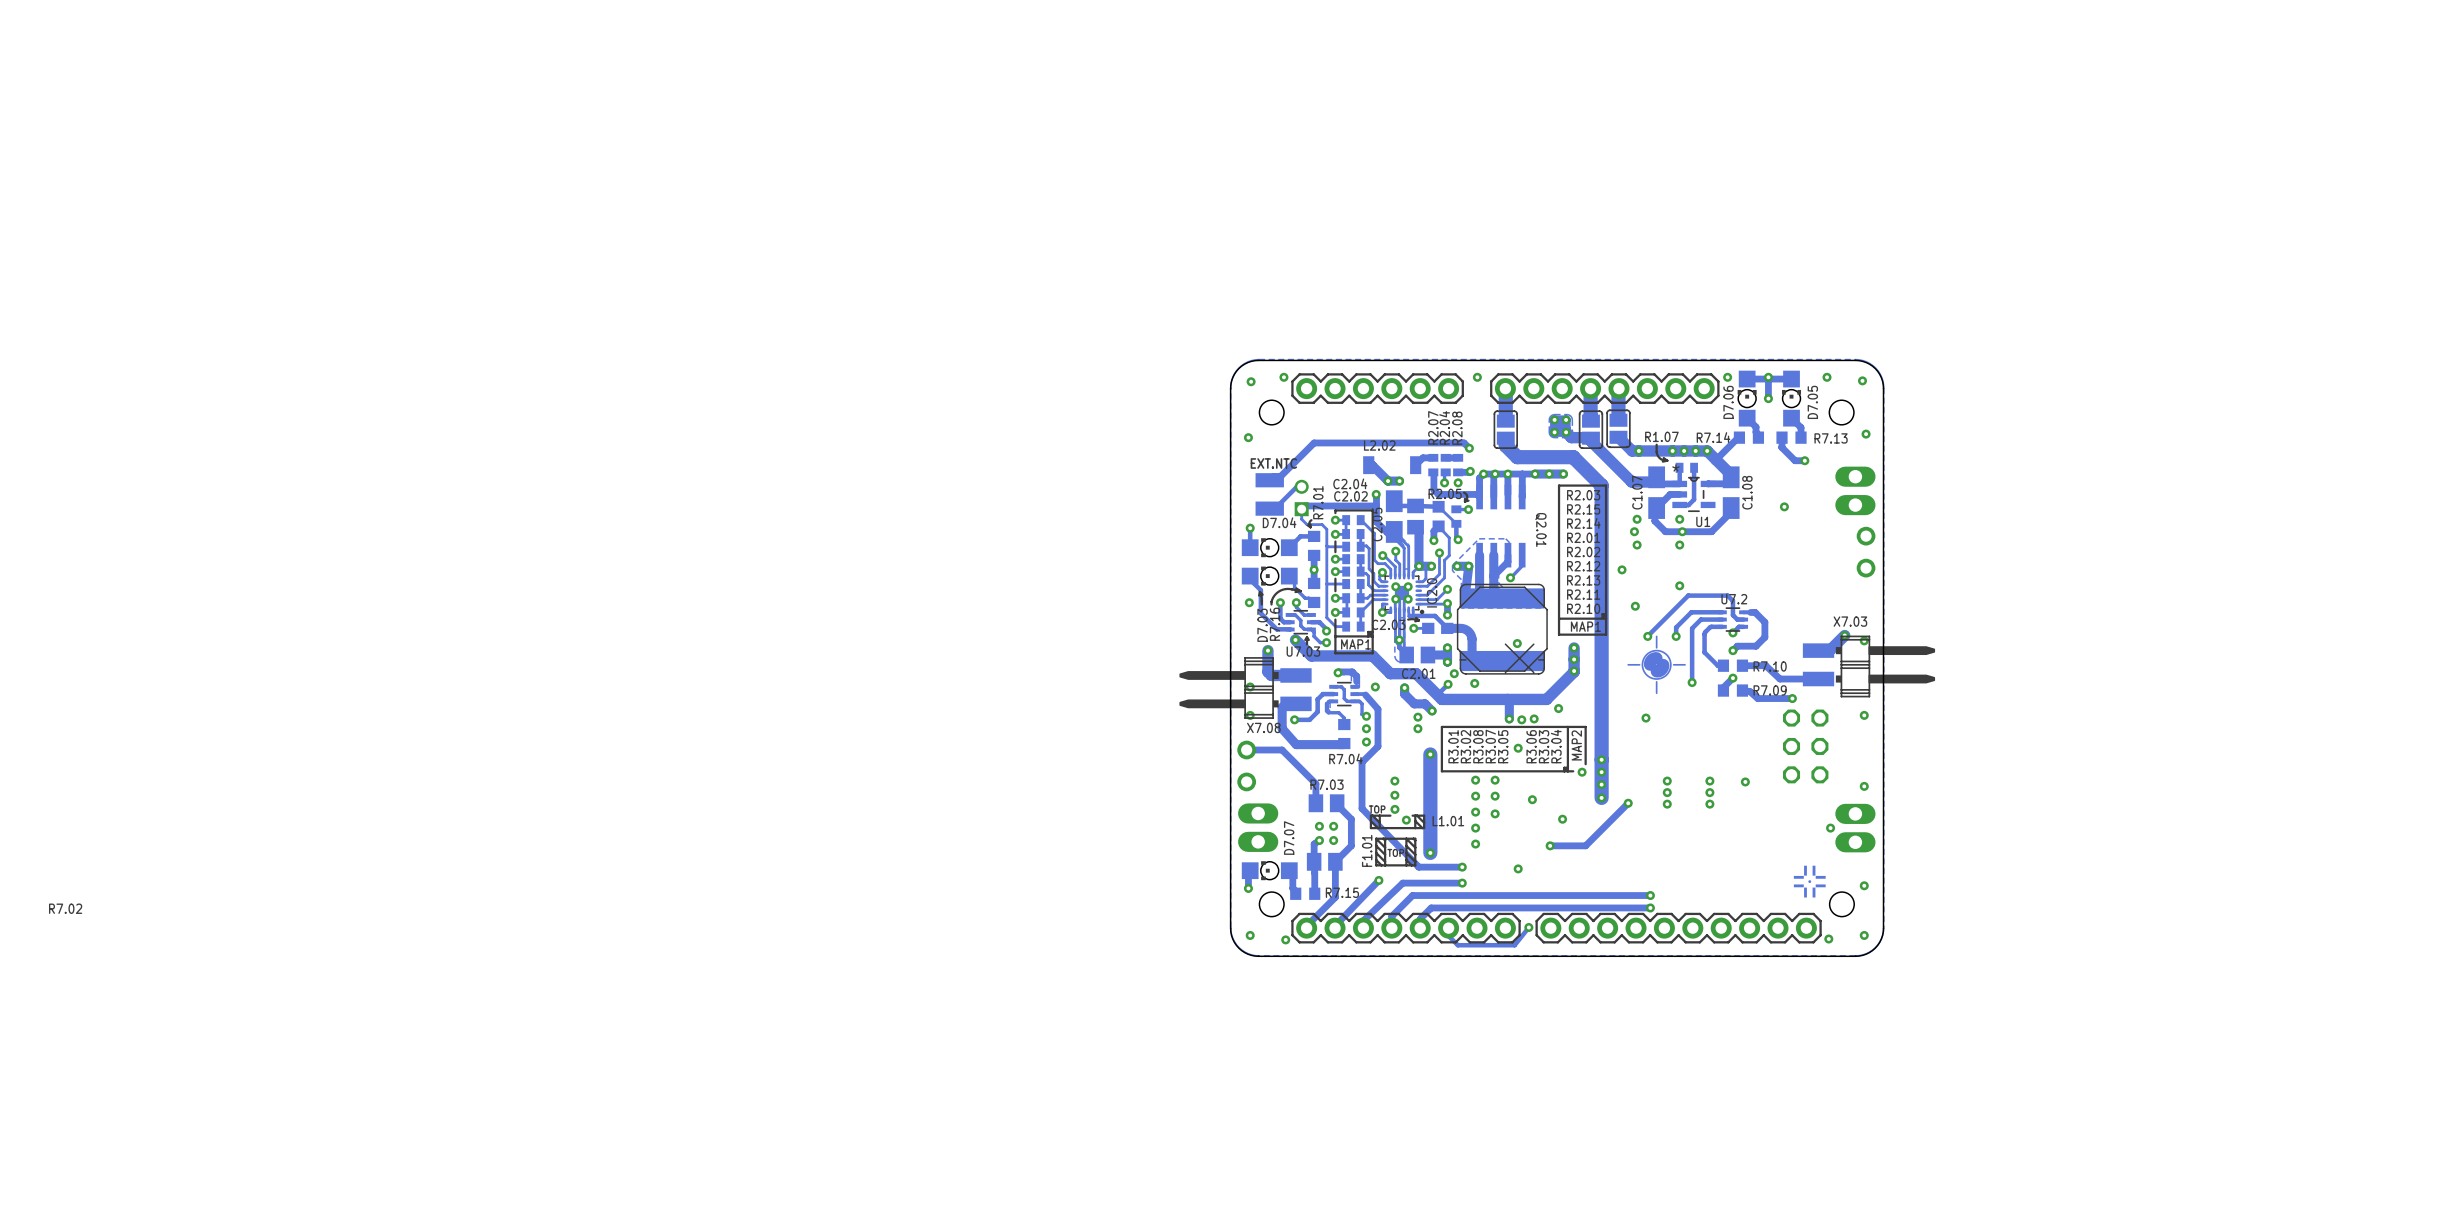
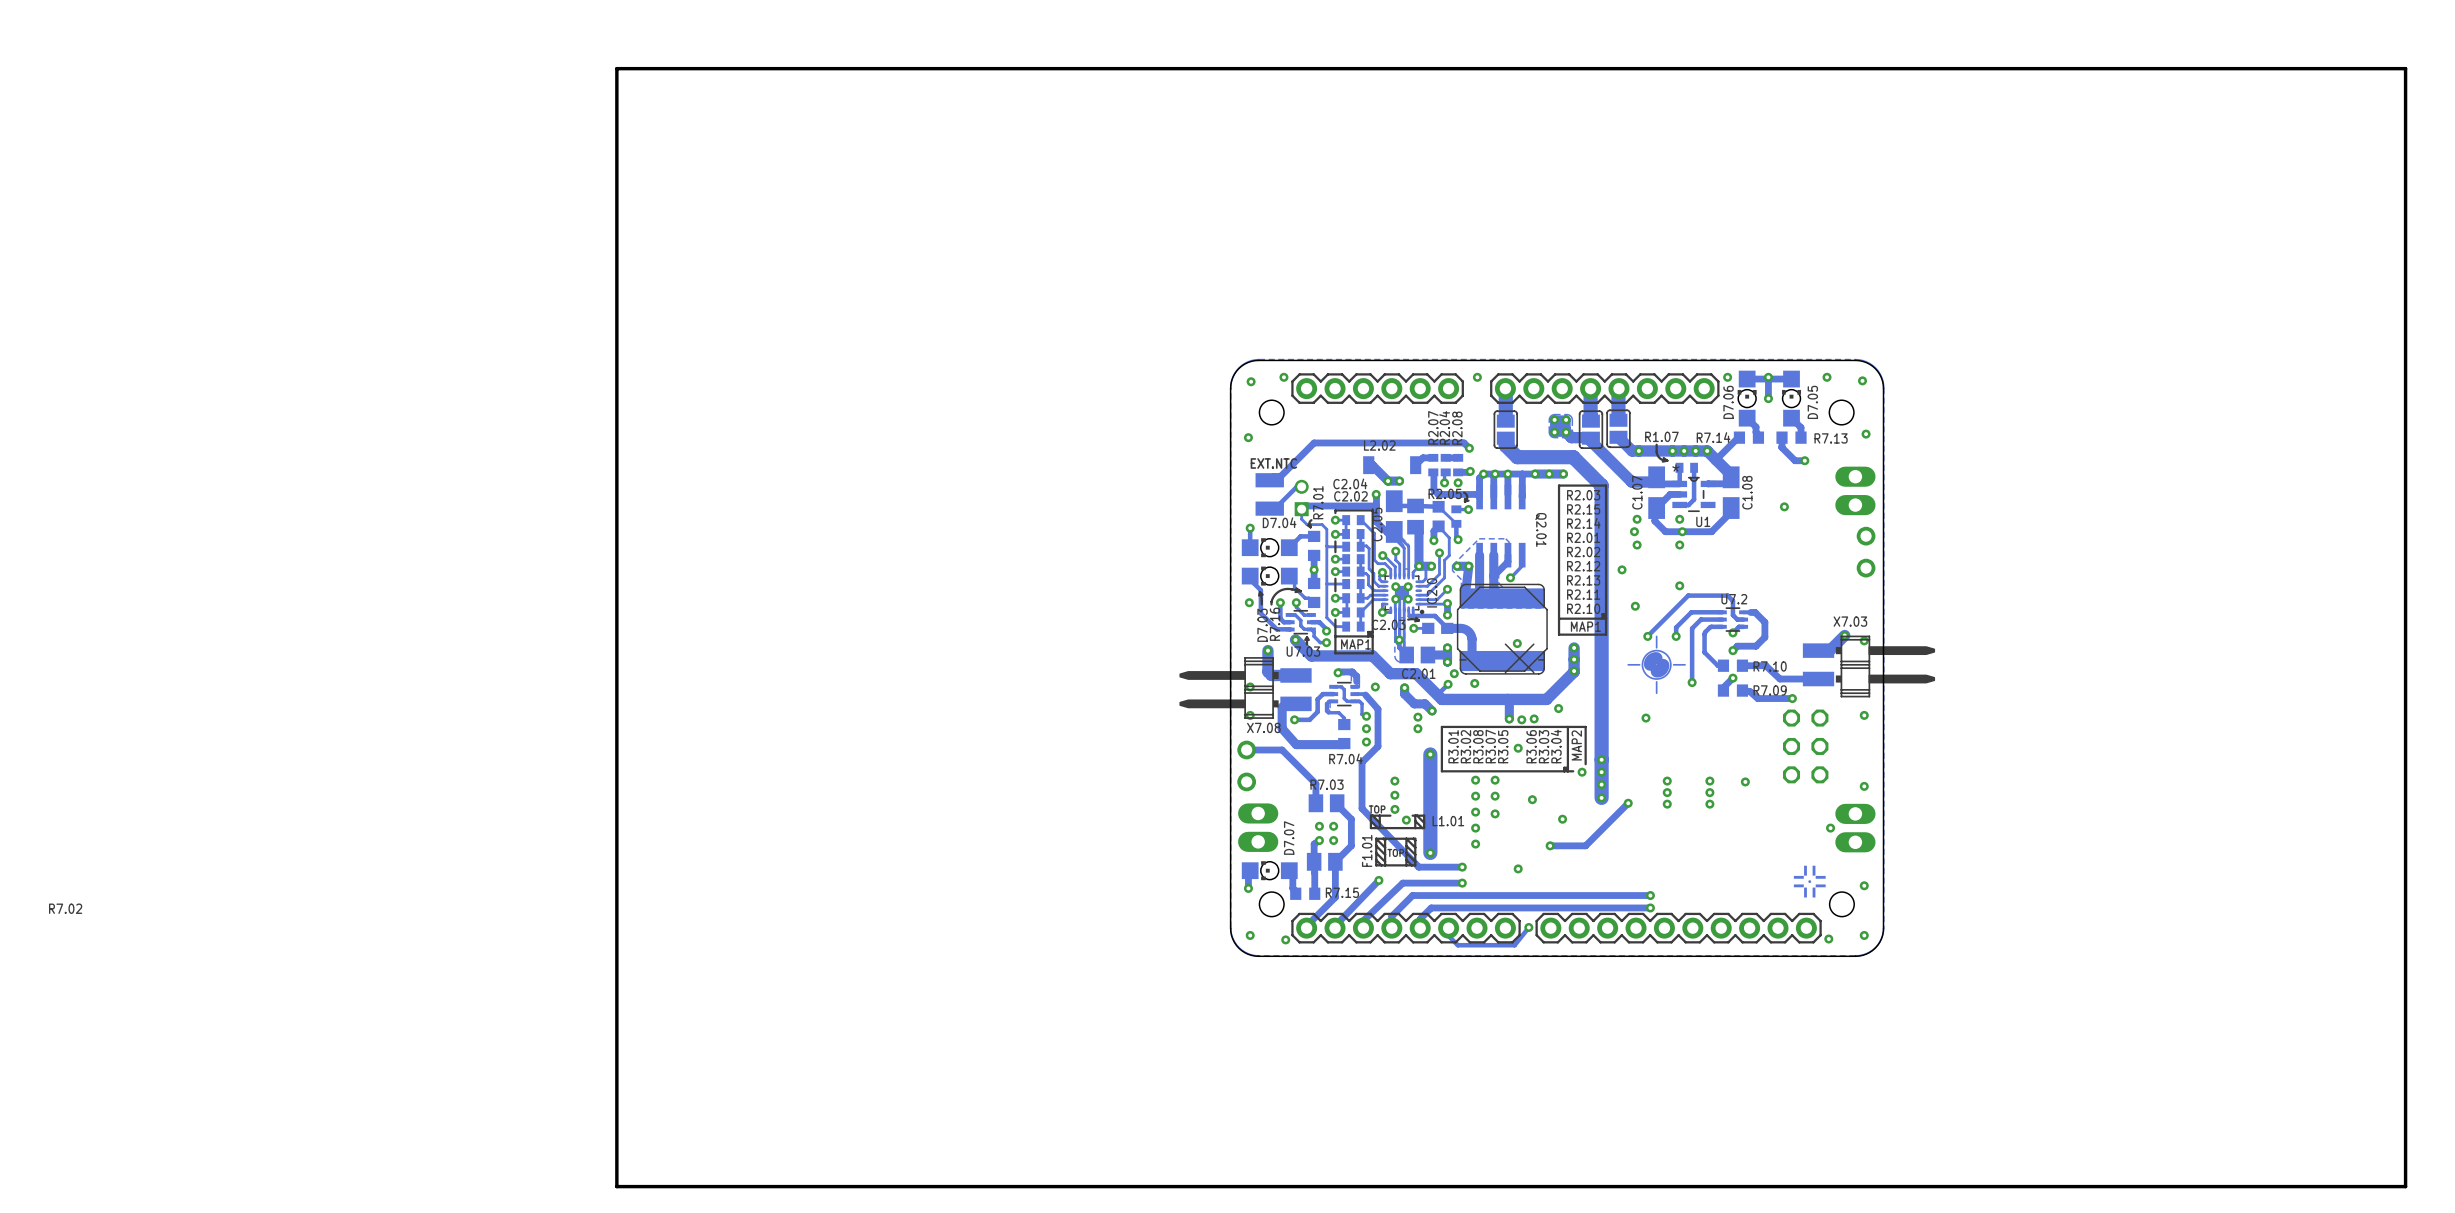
board edge: none -> (2405, 68) (2405, 1186) (616, 1186) (616, 68) (2405, 68)

